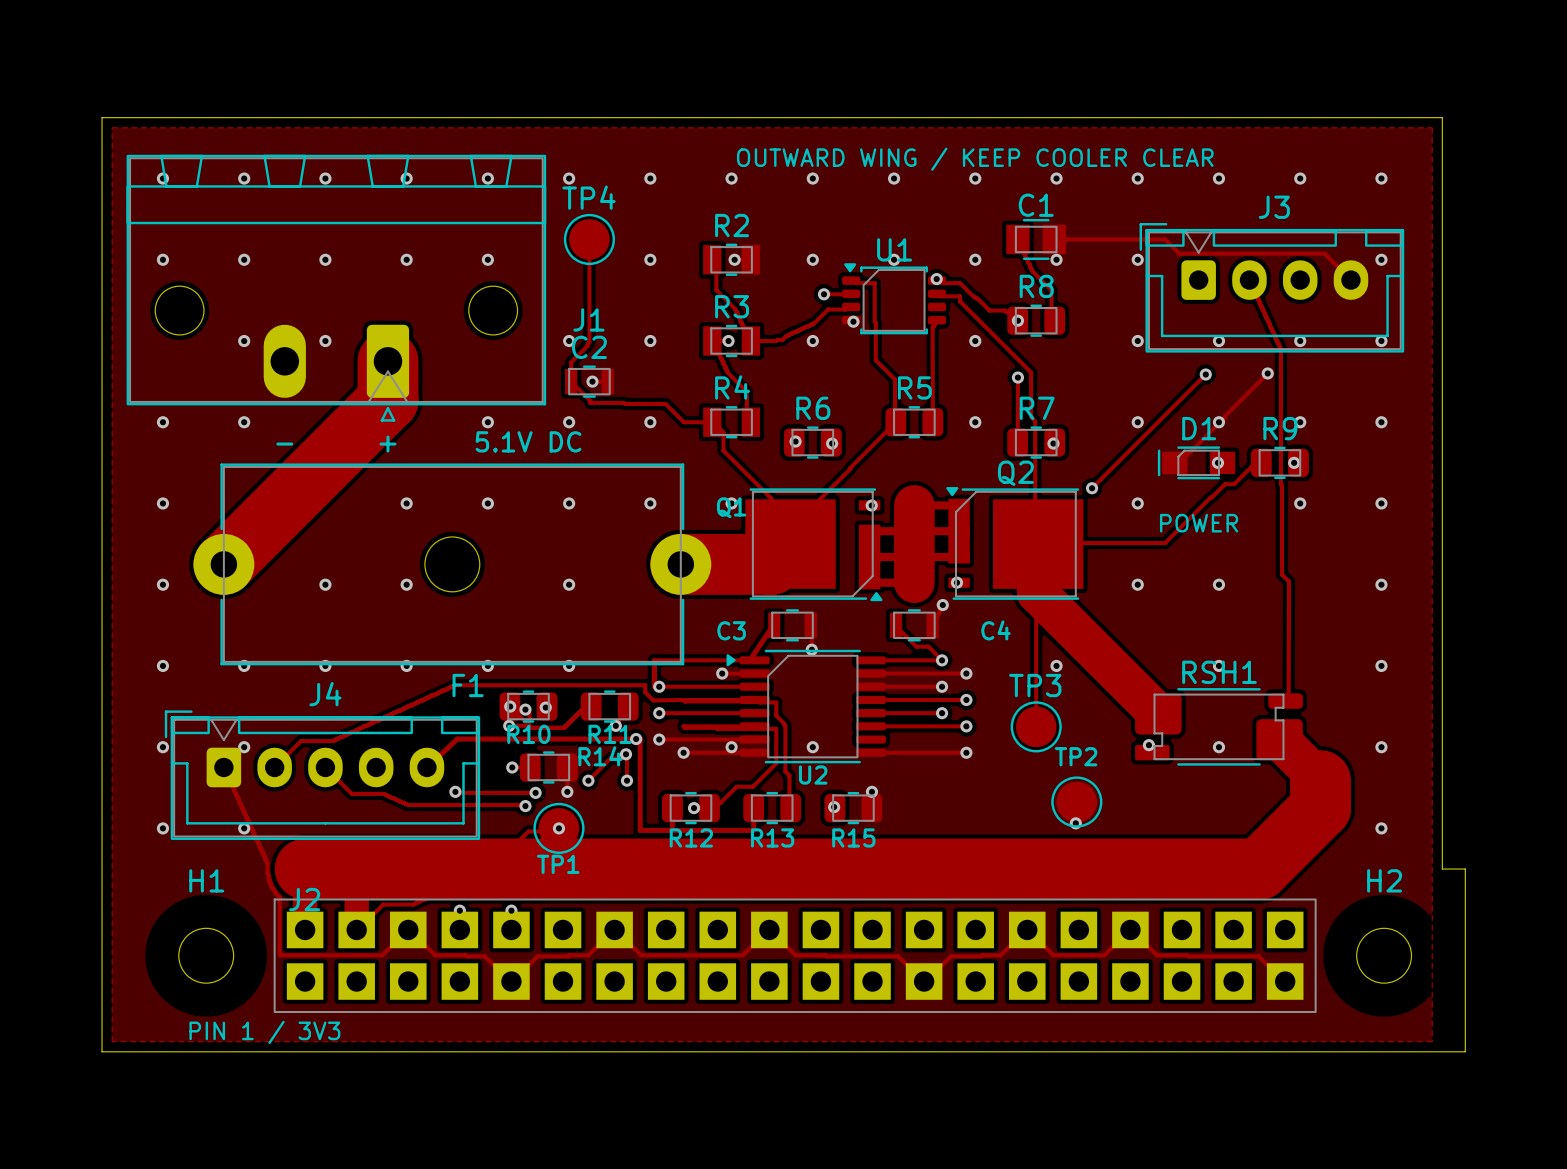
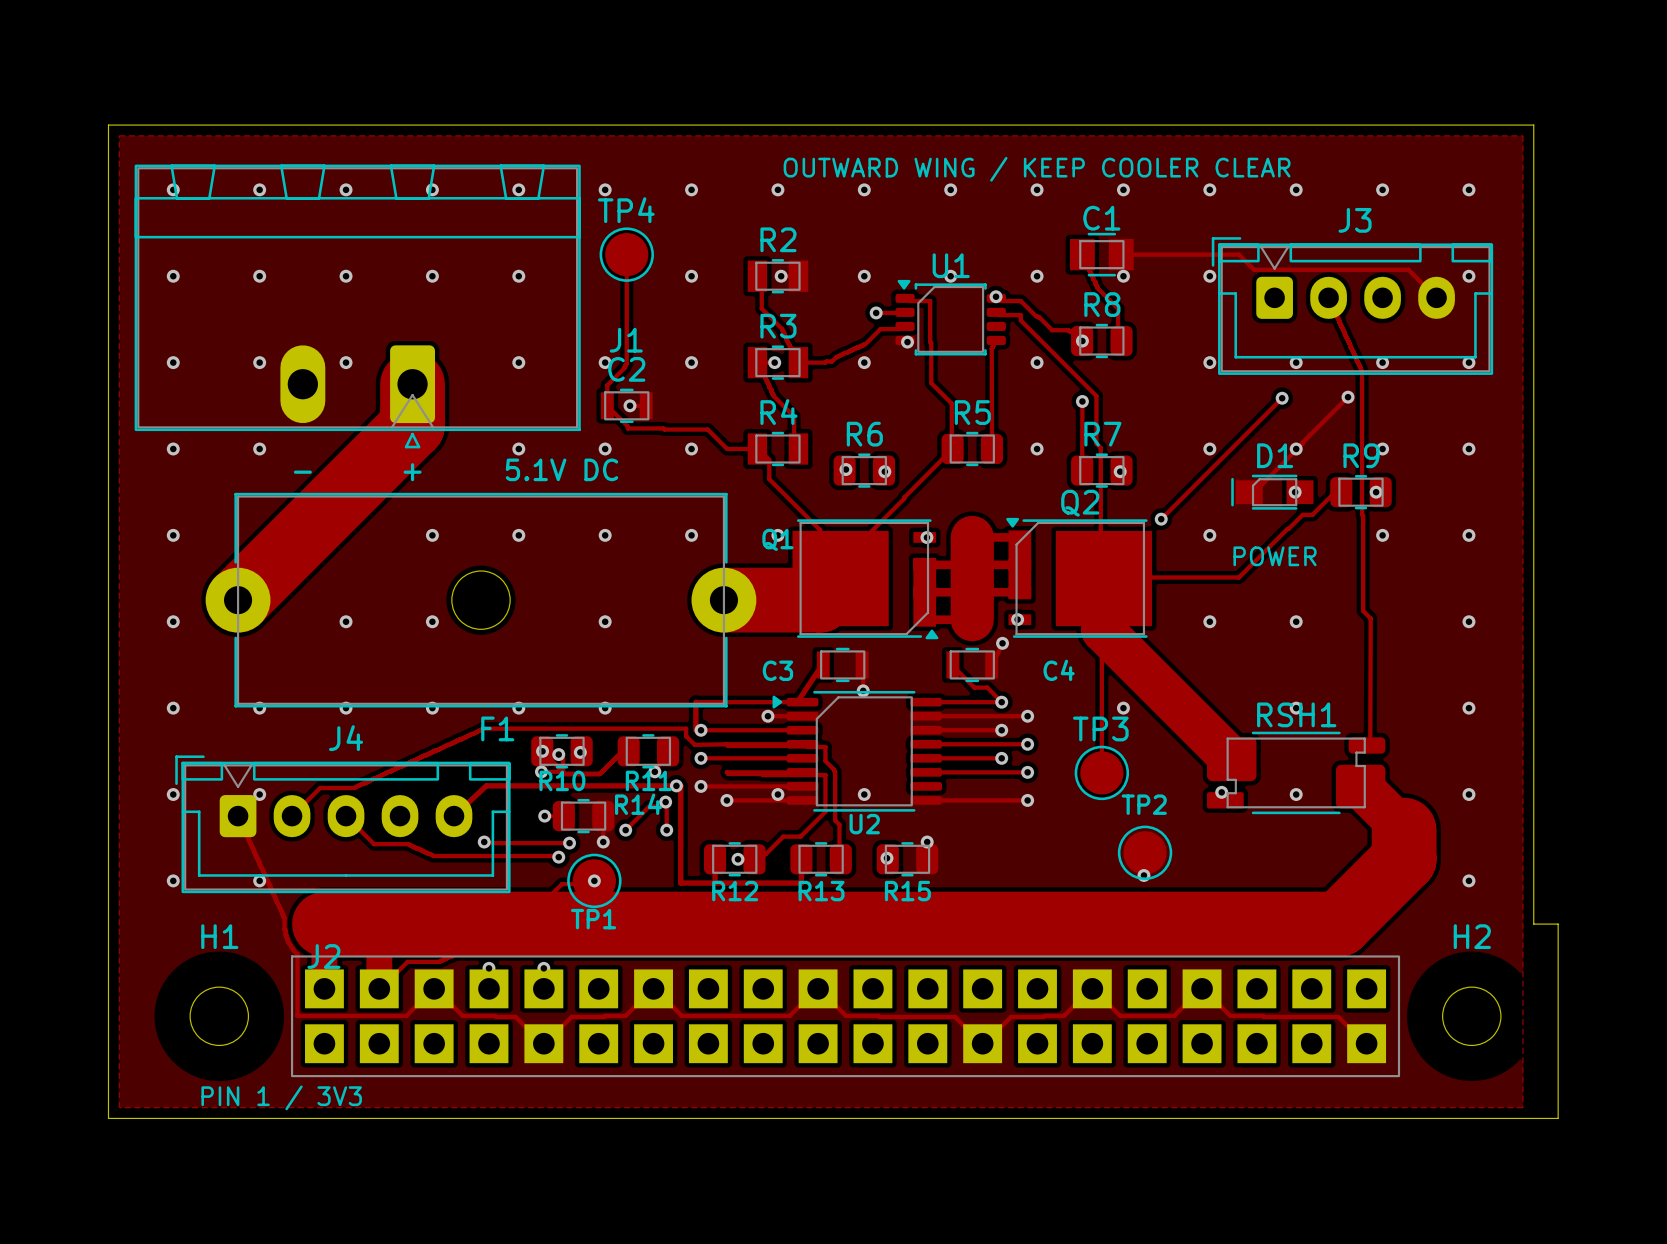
J1 footprint: [126, 154, 547, 422] -> [134, 164, 581, 449]
via: none -> (173, 362)
via: none -> (518, 362)

